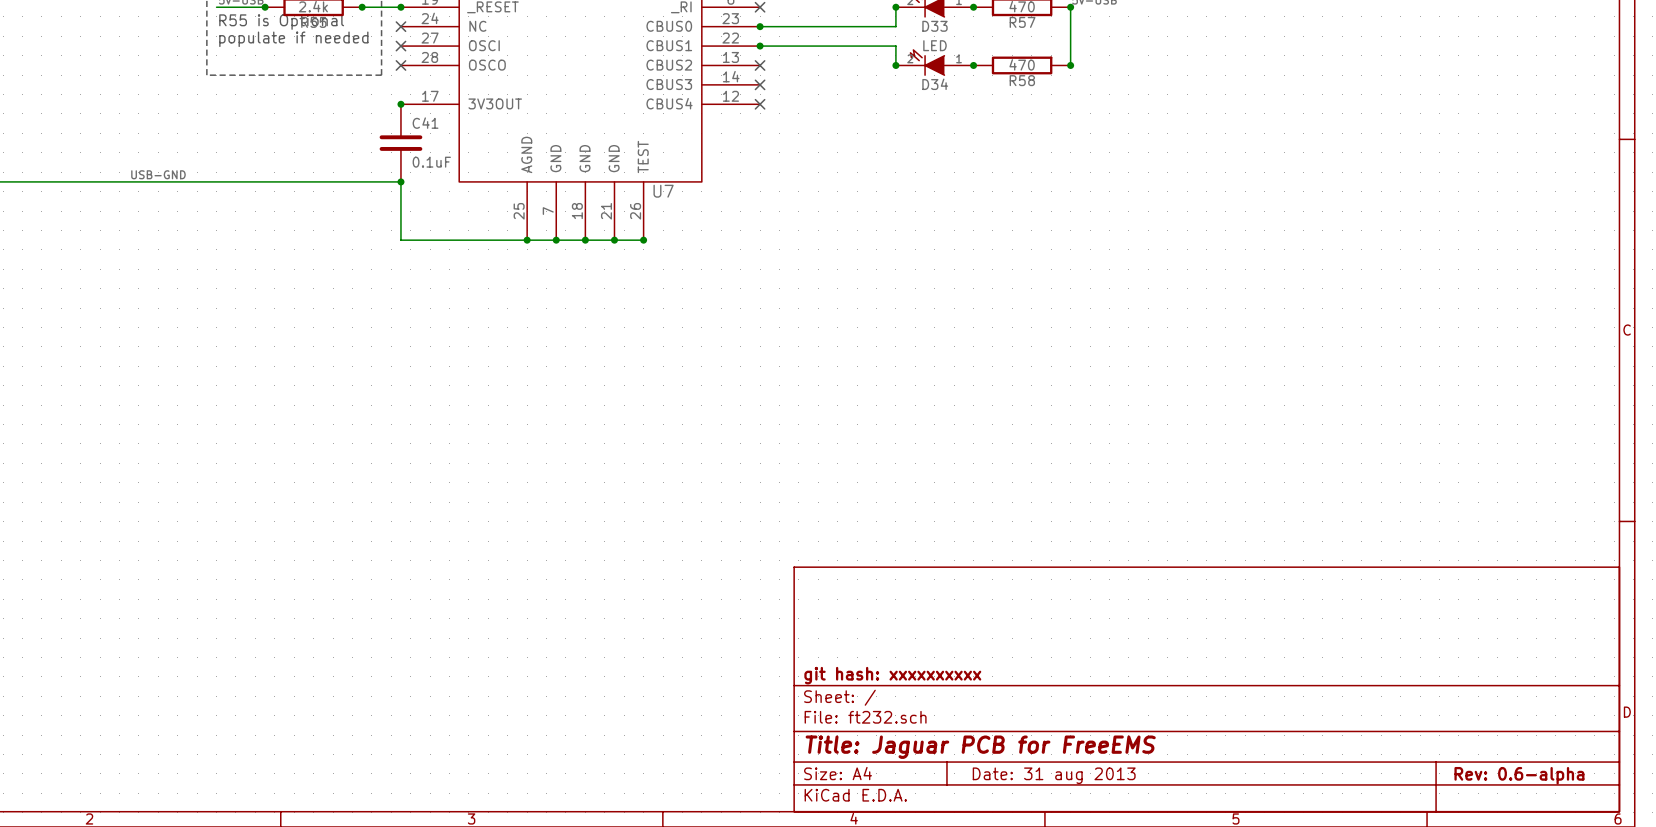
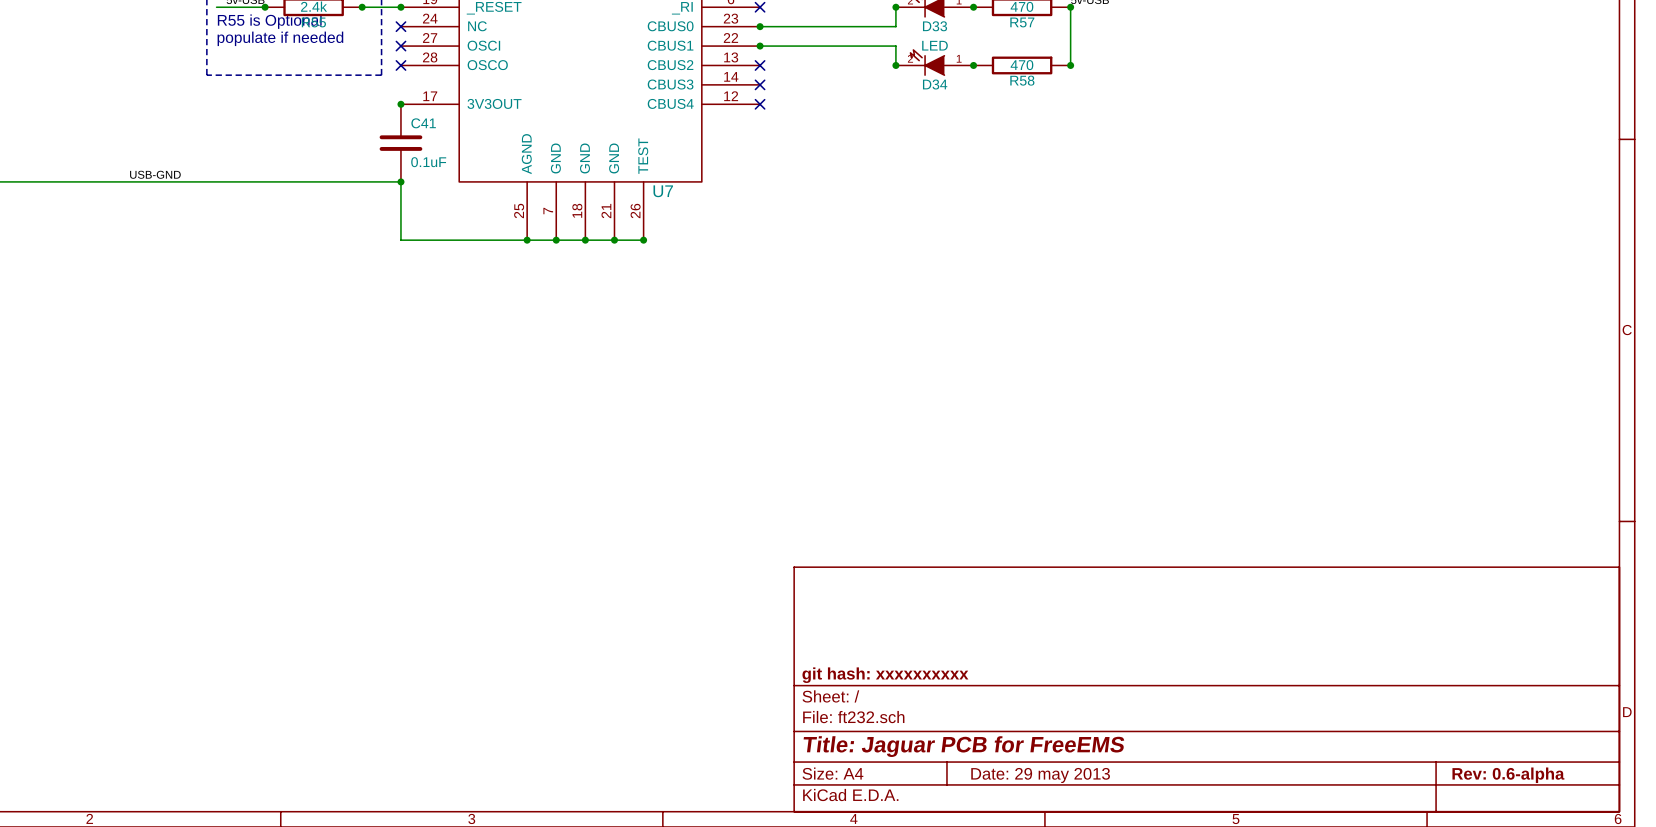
title block: Date: 31 aug 2013 (1054, 775) -> Date: 29 may 2013 (1040, 775)

